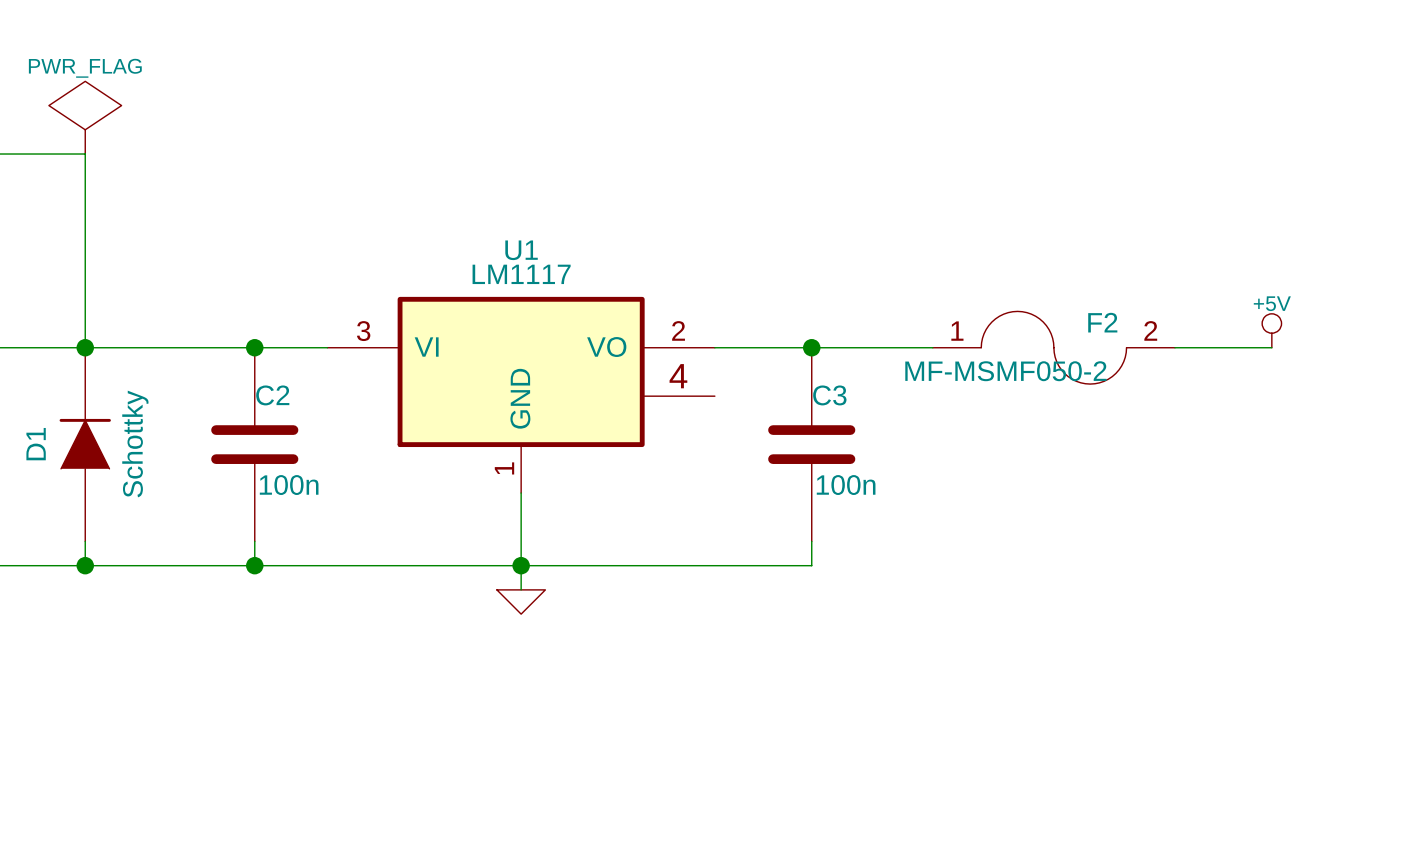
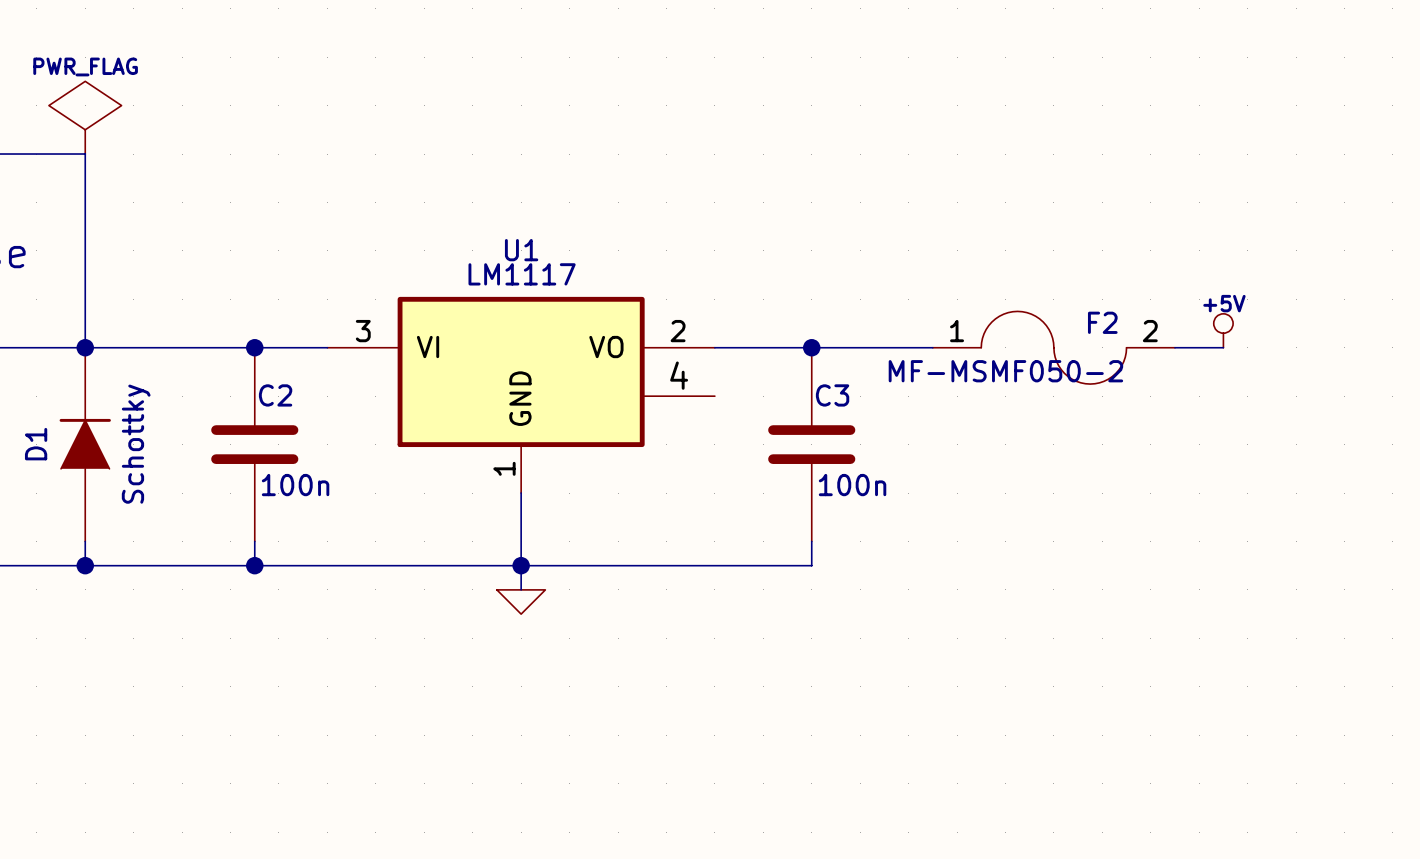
power symbol position: +5V (1271, 330) -> +5V (1223, 330)
wire: (1223, 347) (1271, 347) -> none

